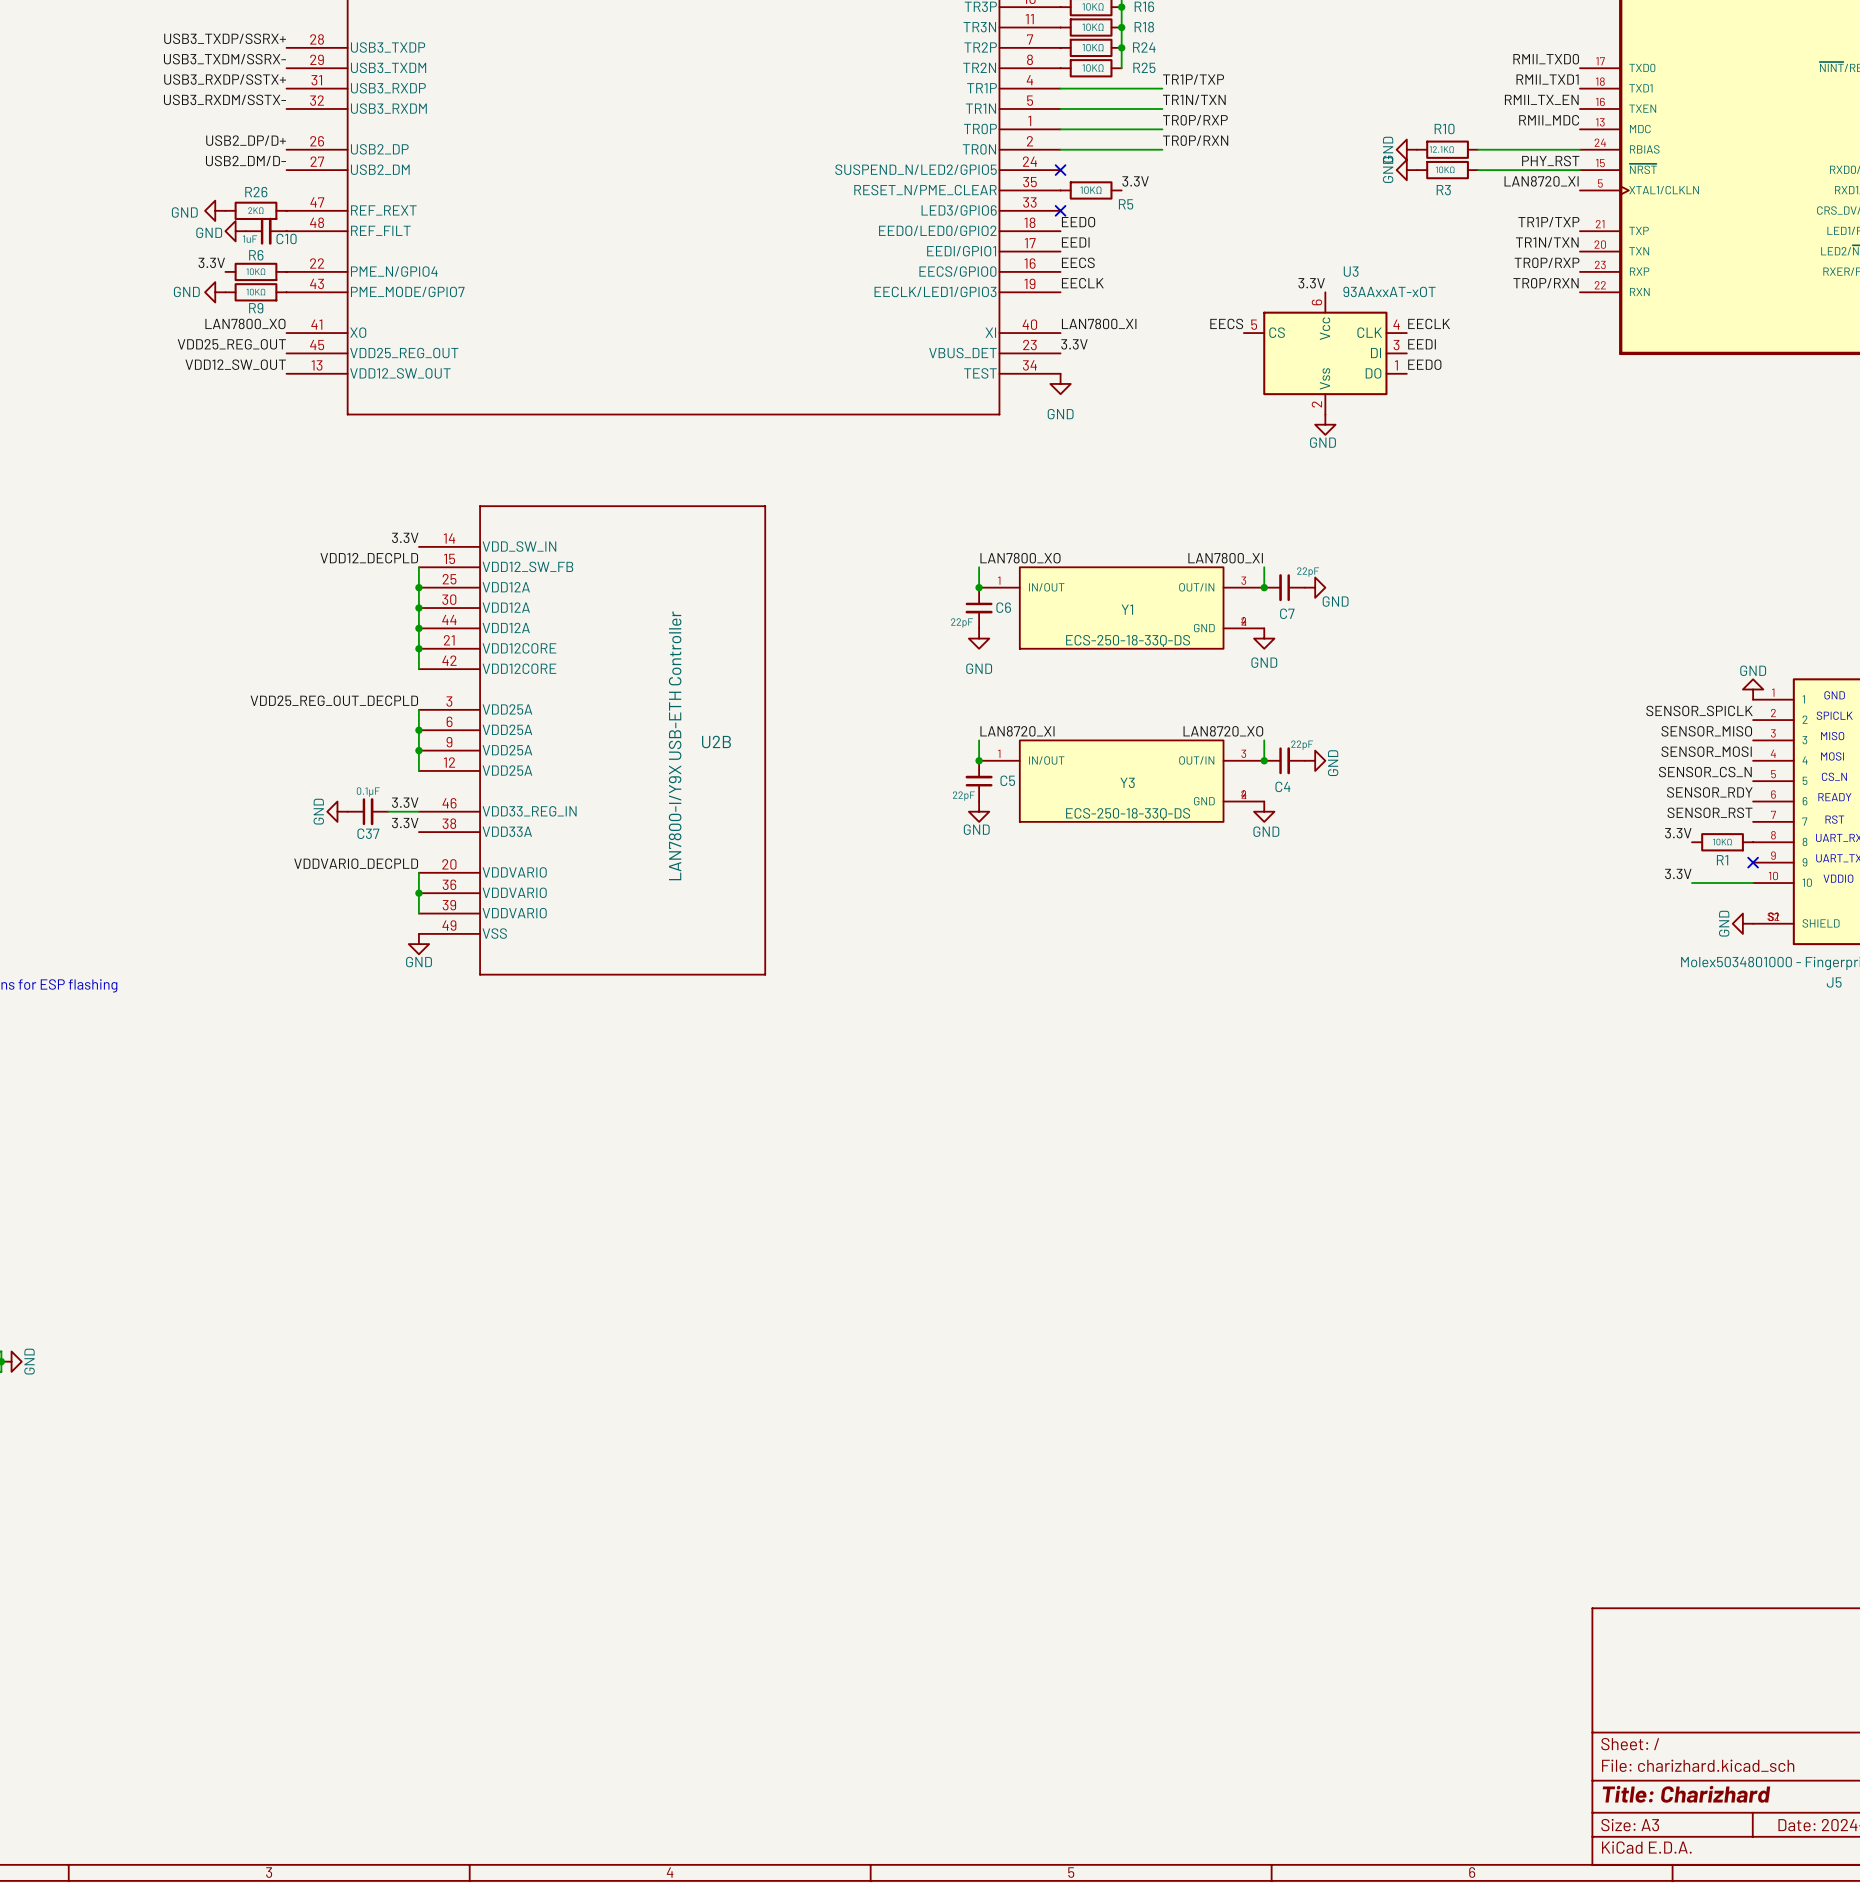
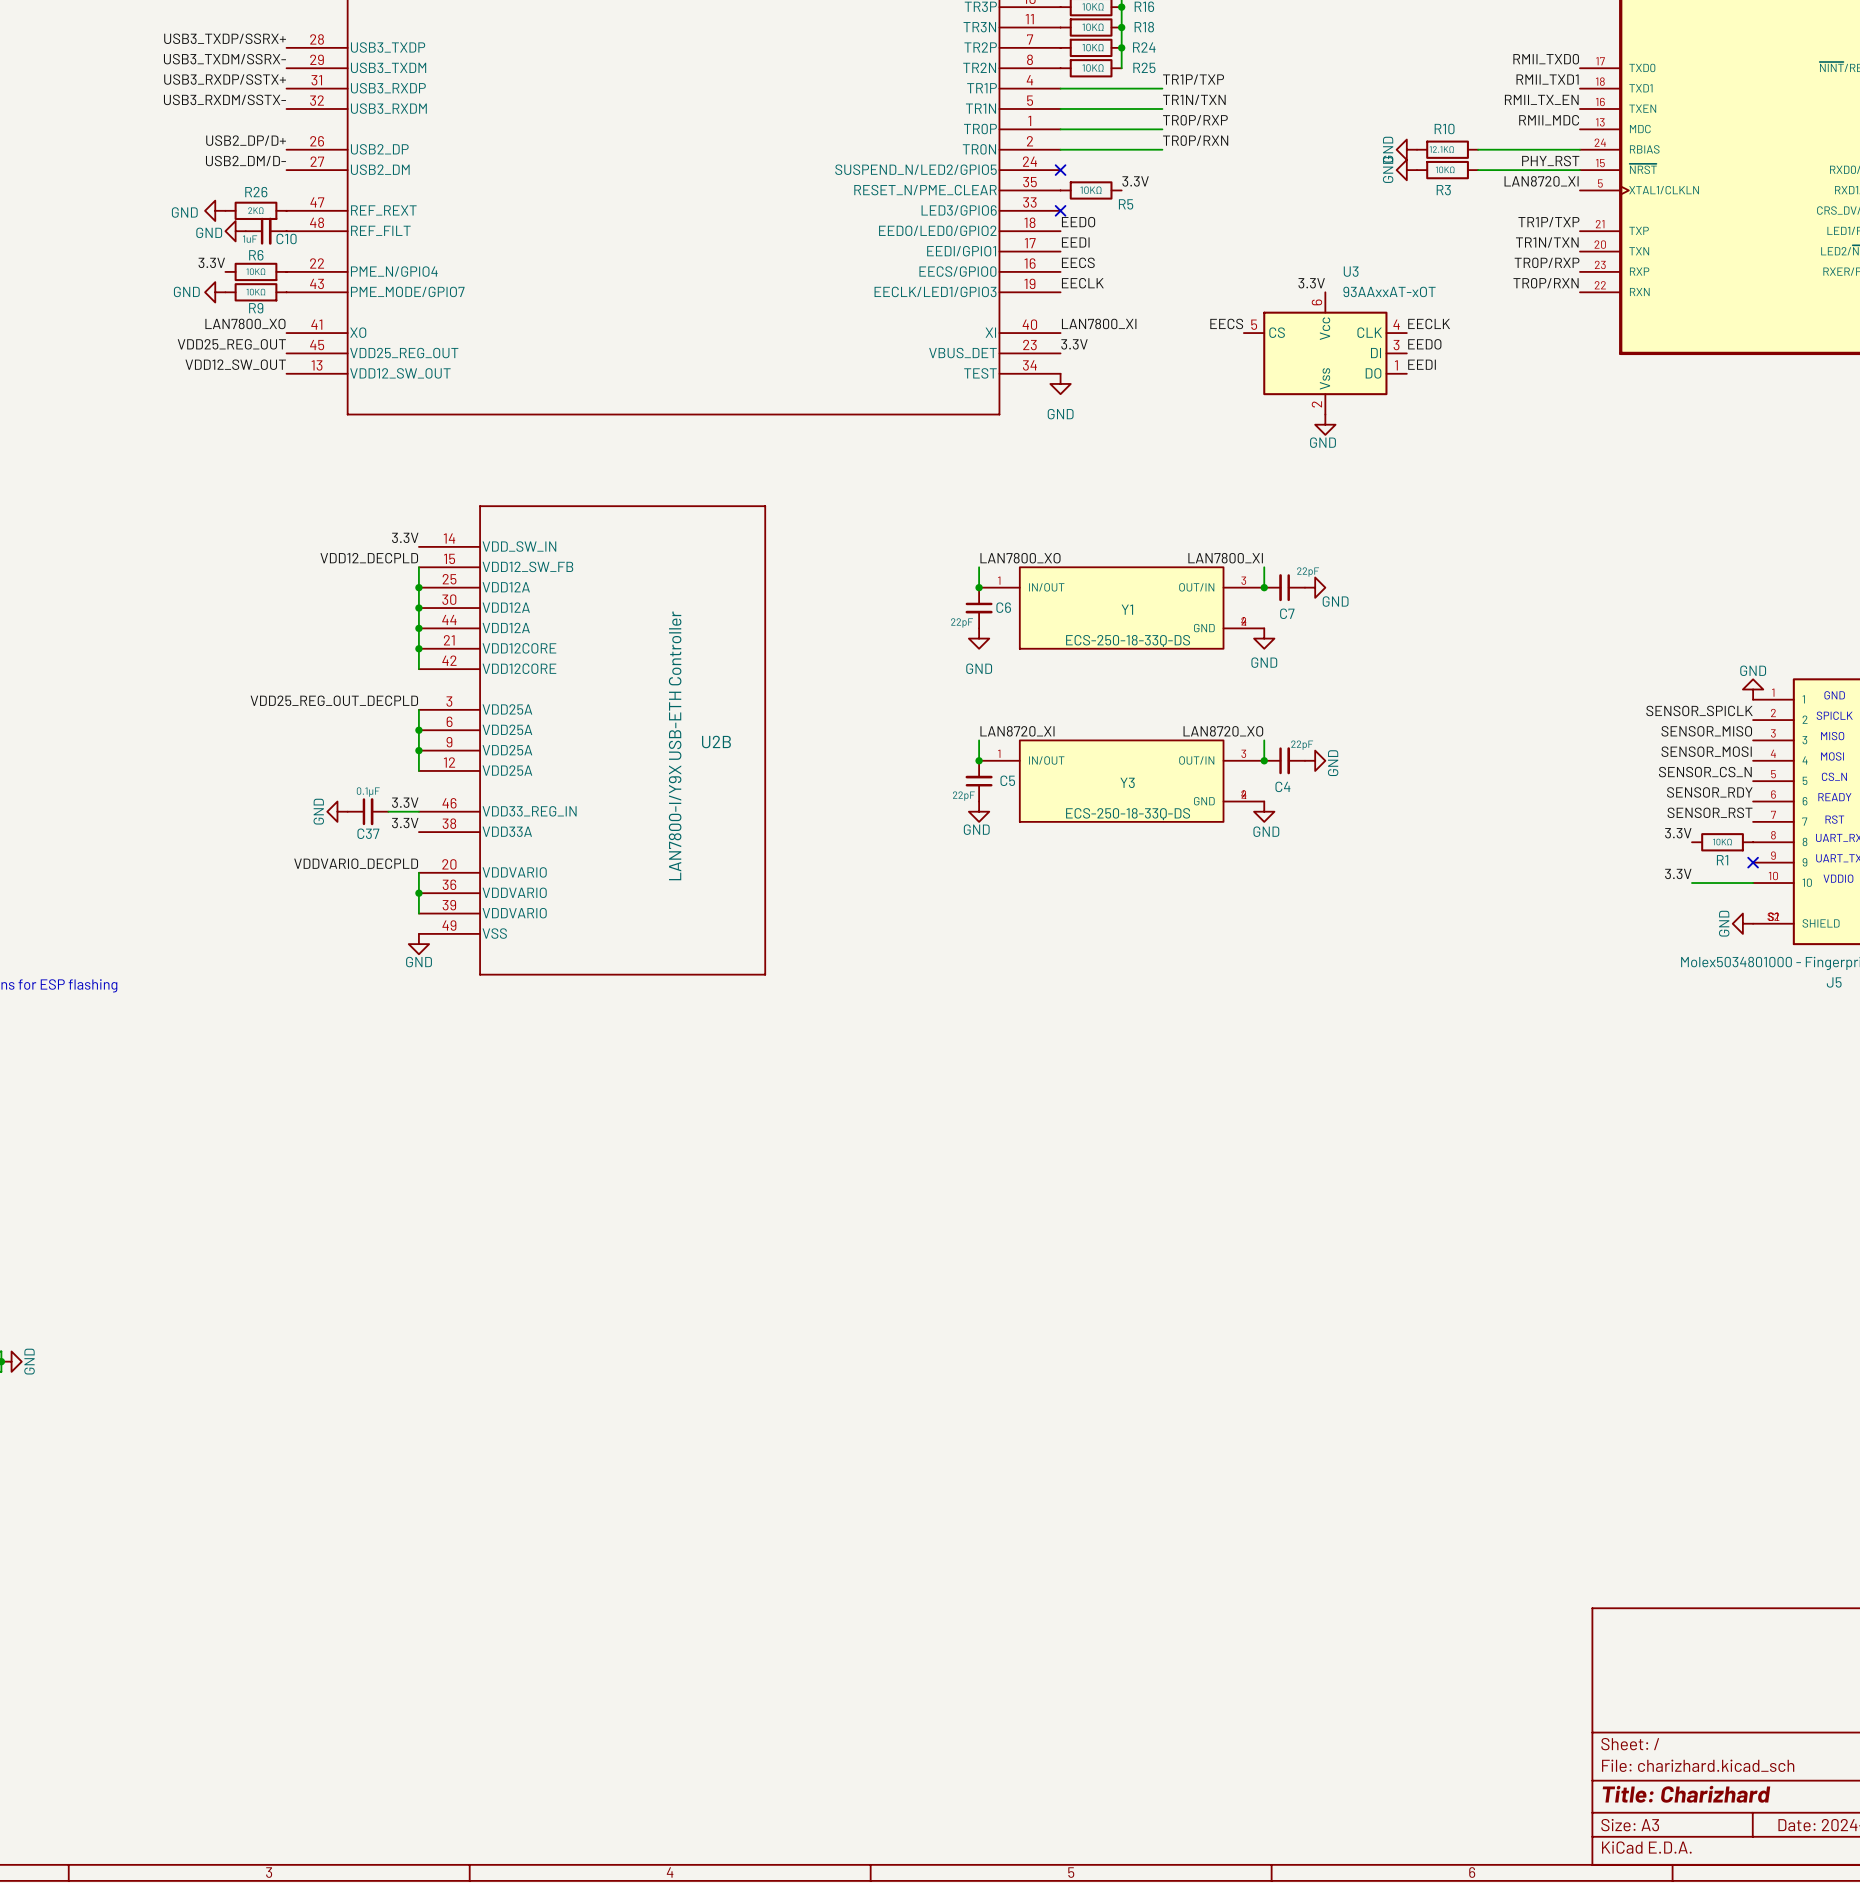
label: EEDI (1422, 344) -> EEDO (1424, 344)
label: EEDO (1424, 364) -> EEDI (1422, 364)

